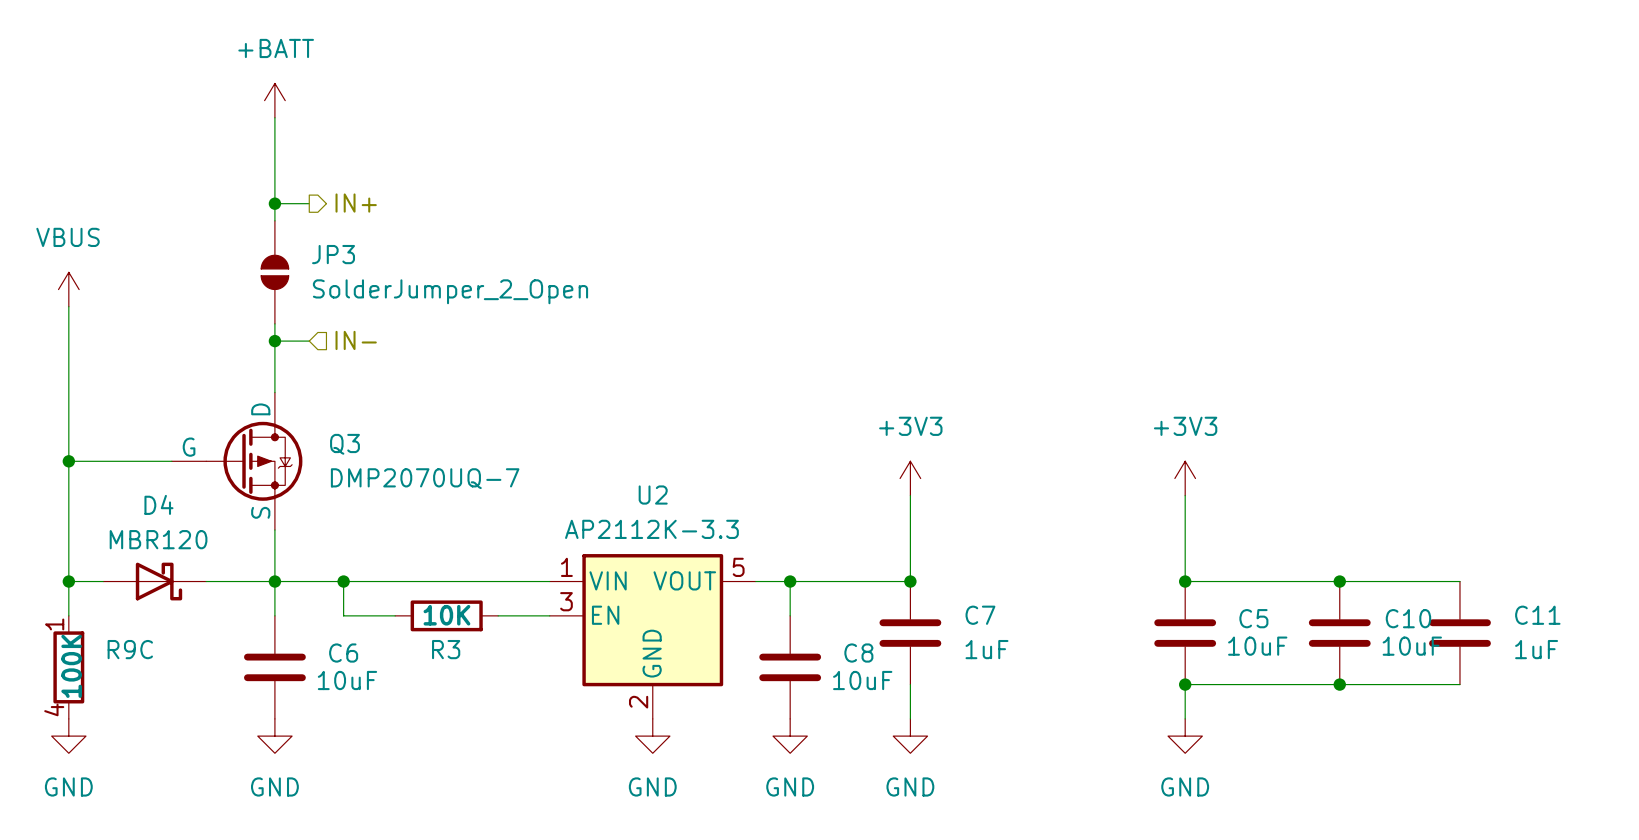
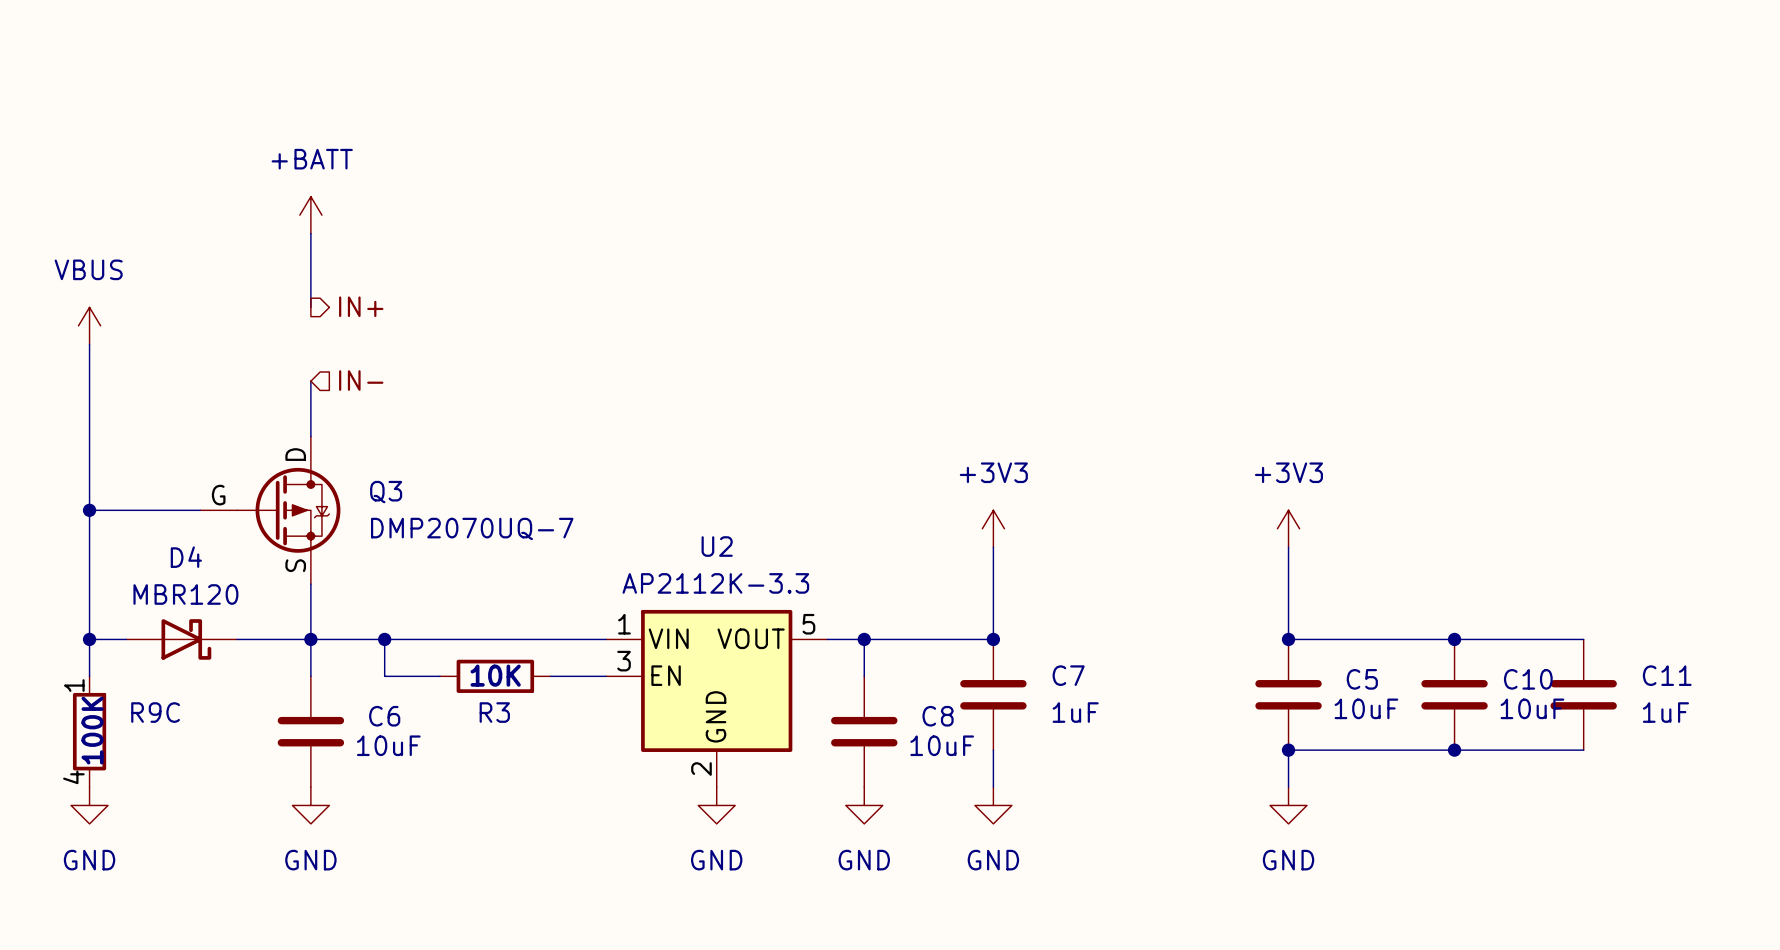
power symbol position: +BATT (274, 100) -> +BATT (310, 215)
wire: (274, 117) (274, 203) (309, 203) -> none
junction: (274, 203) -> none
hierarchical label position: IN+ (356, 203) -> IN+ (361, 306)
JP3: SolderJumper_2_Open (274, 272) -> none
wire: (274, 323) (274, 341) (309, 341) -> none
hierarchical label position: IN- (356, 340) -> IN- (361, 380)
junction: (274, 341) -> none

